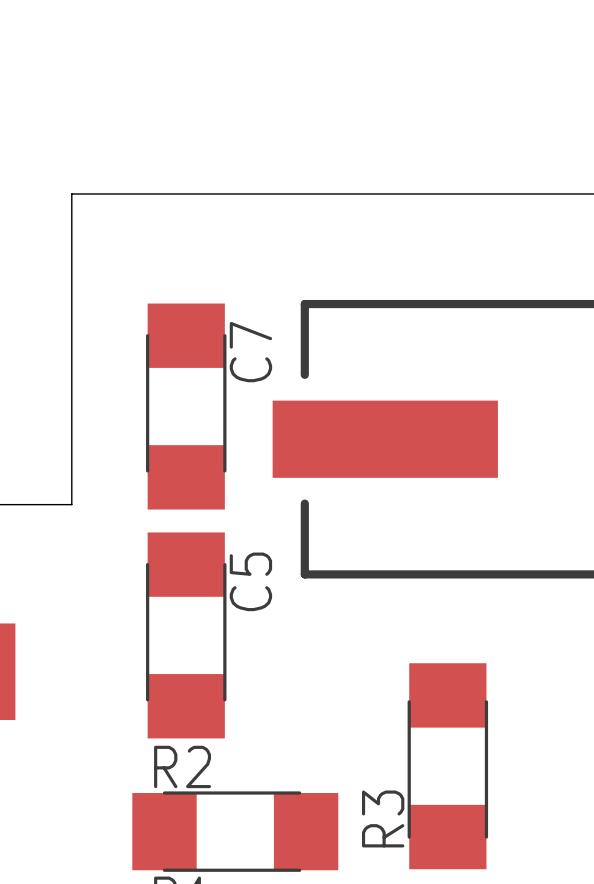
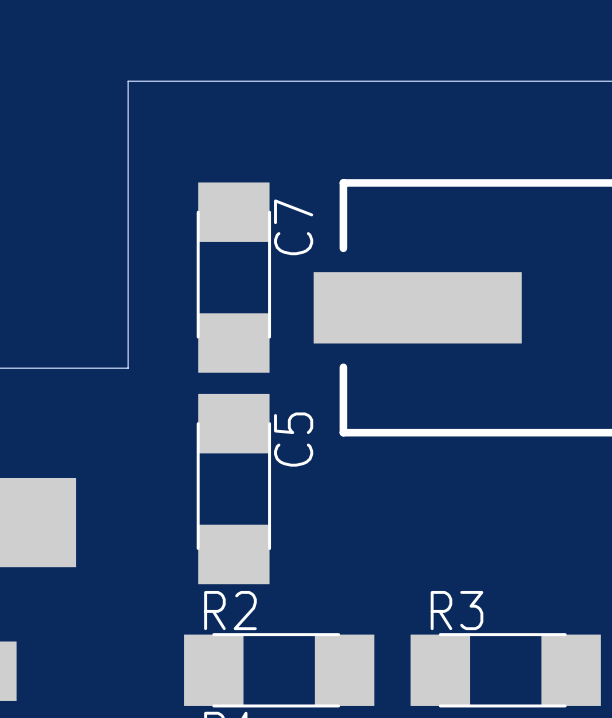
R3 rotation: 0° (447, 766) -> 90° clockwise (505, 670)

